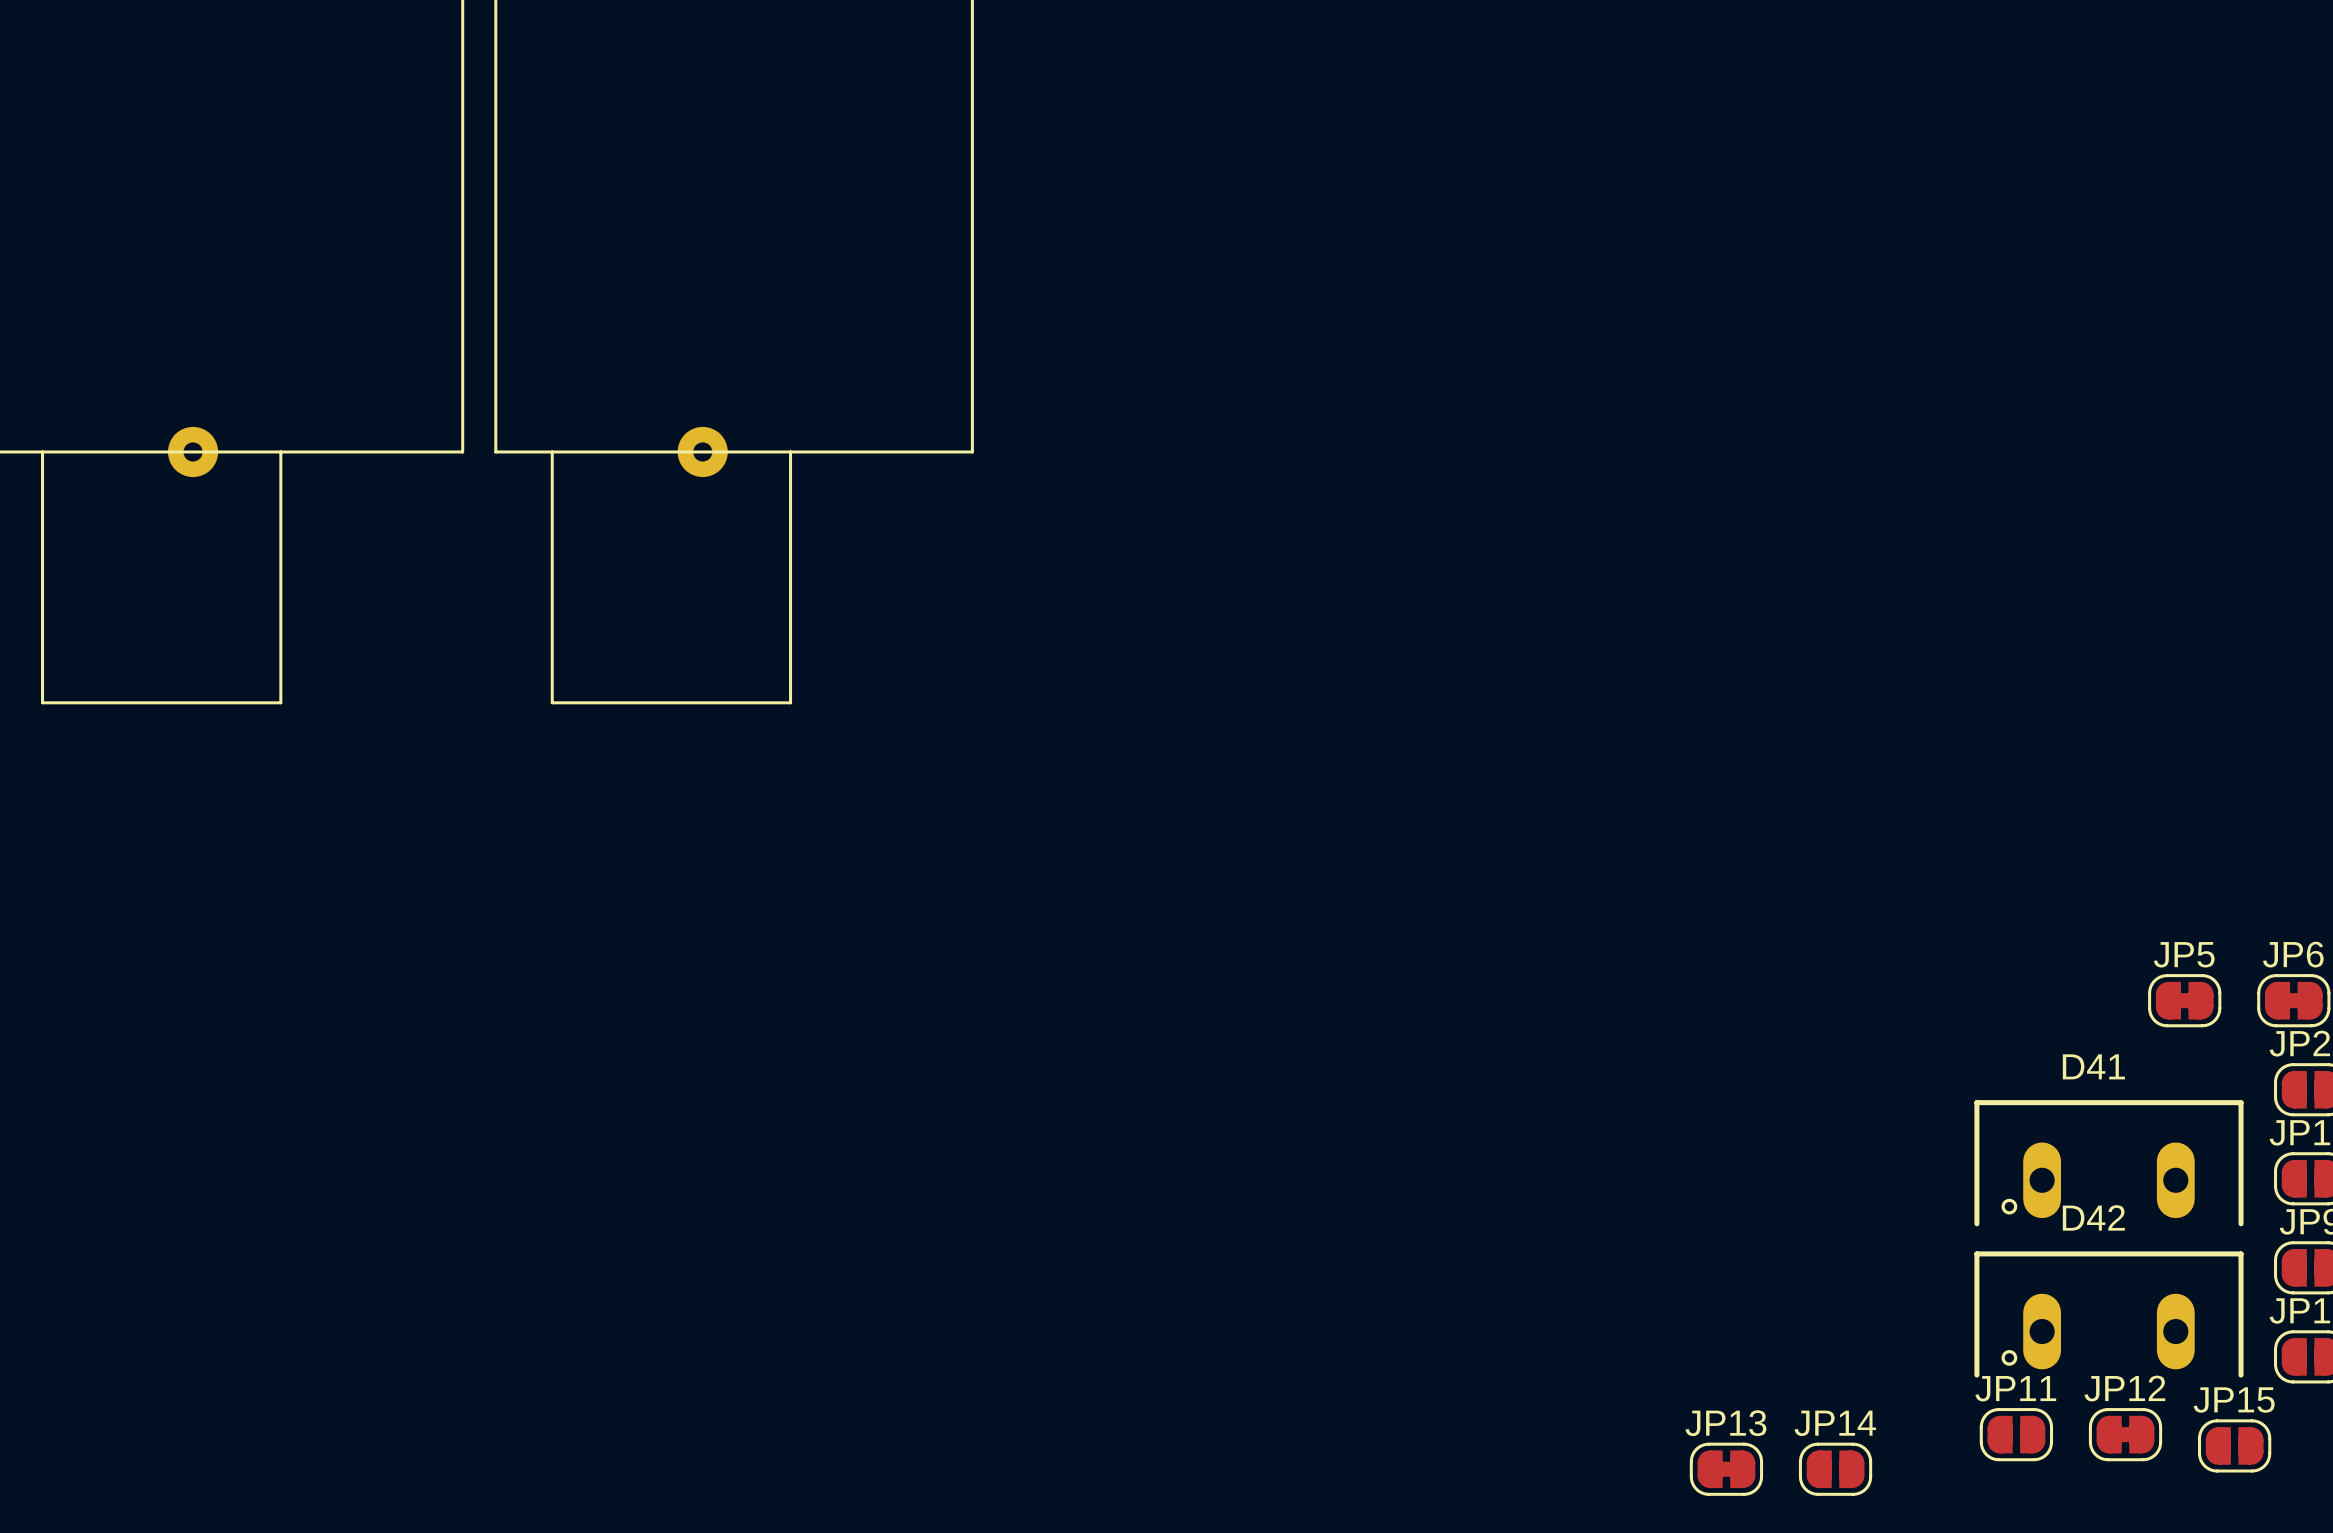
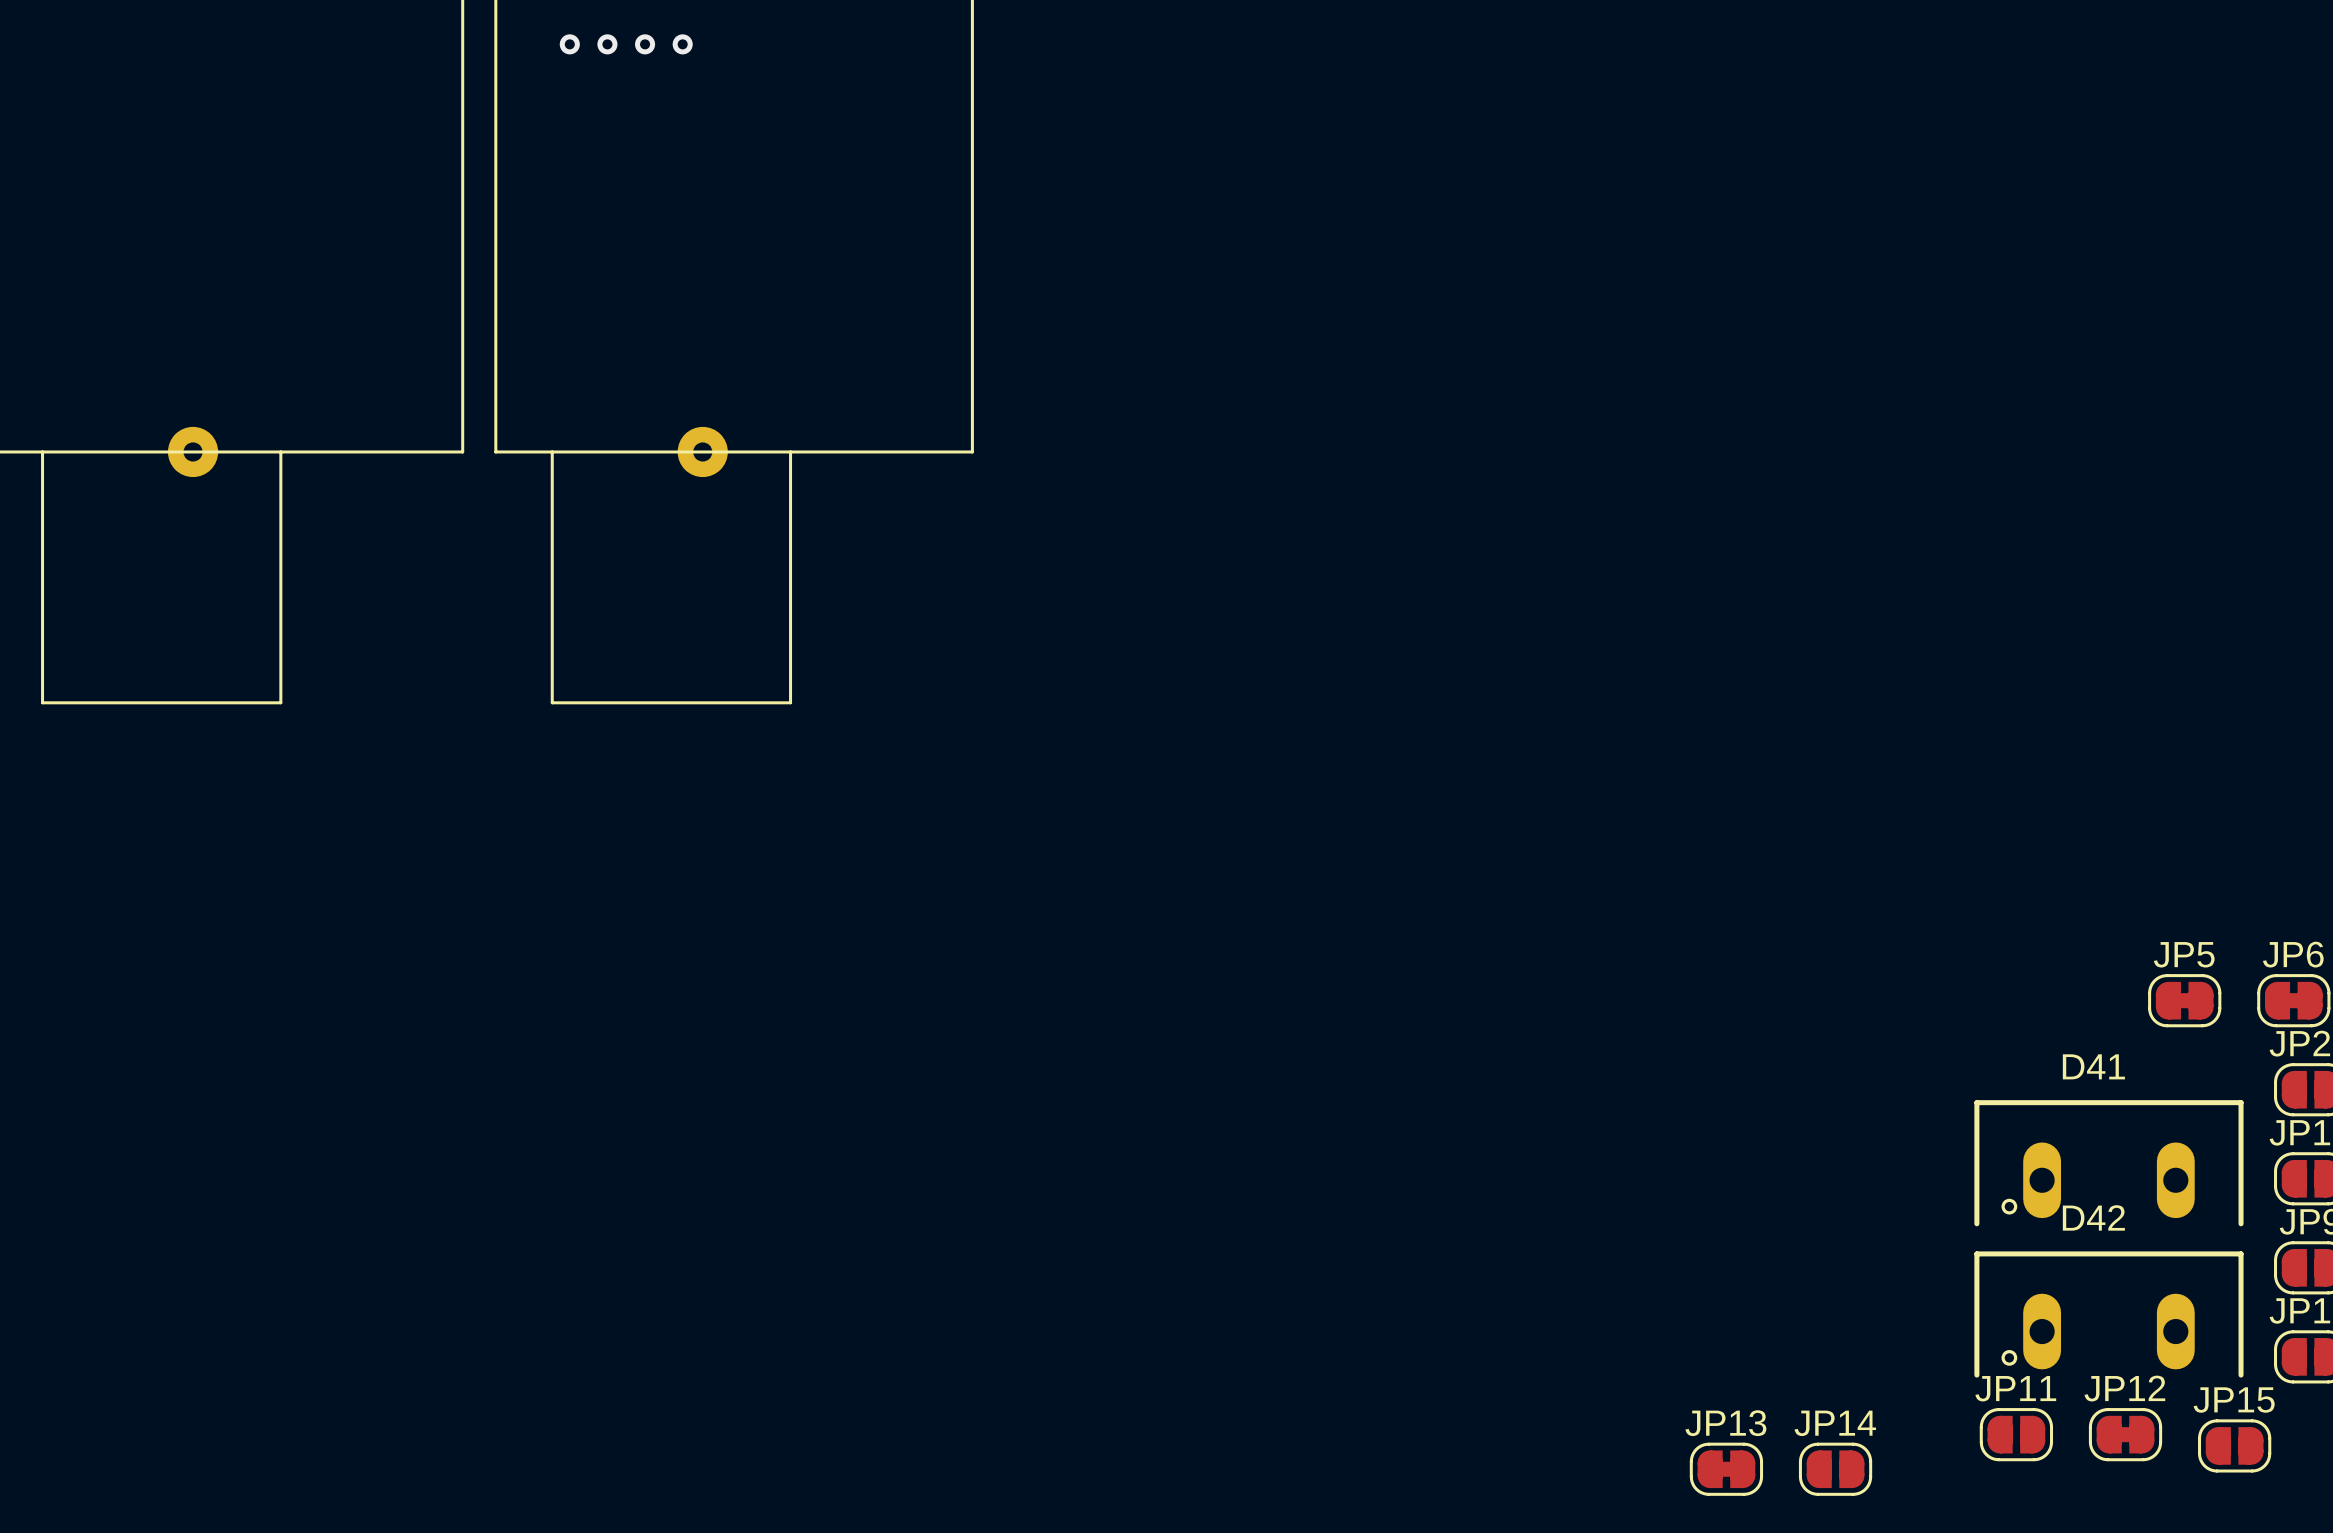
via: none -> (569, 44)
via: none -> (607, 44)
via: none -> (645, 44)
via: none -> (682, 44)

